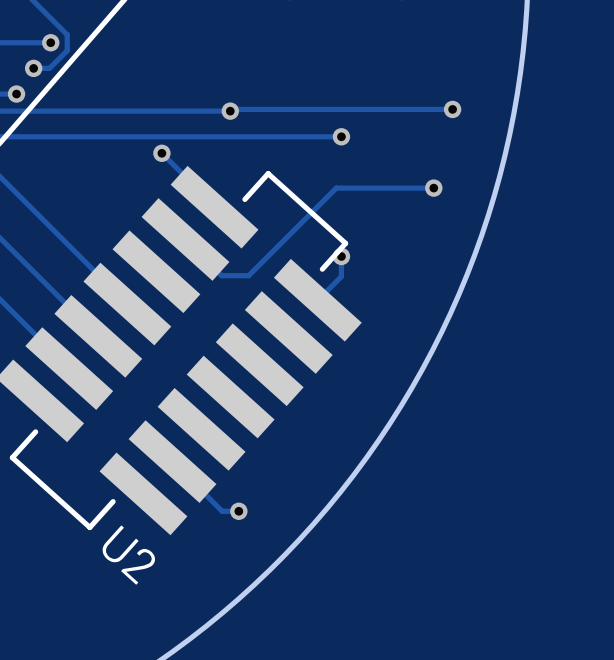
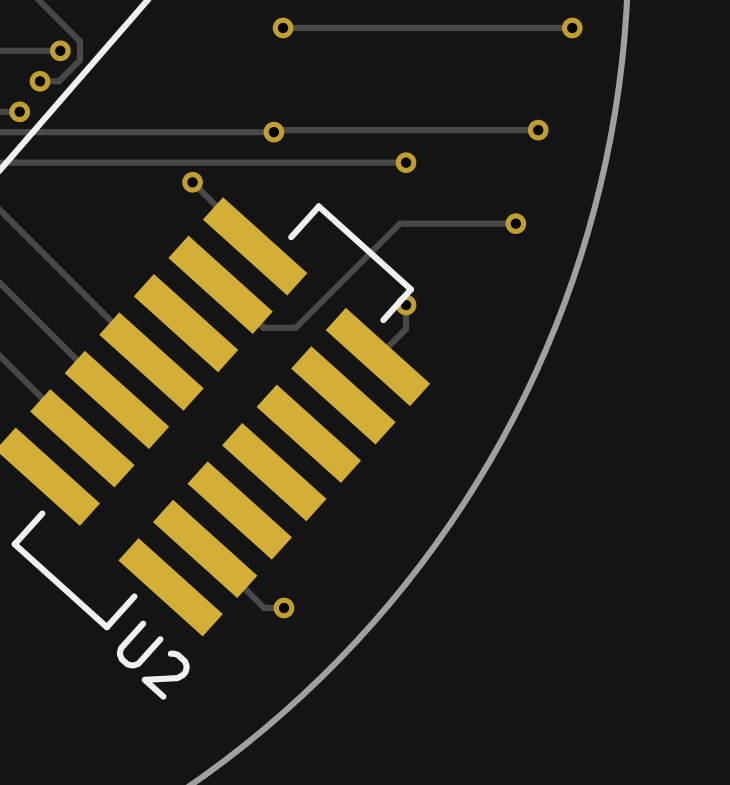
via: none -> (283, 27)
track: none -> (572, 27) (283, 27)
via: none -> (572, 27)

